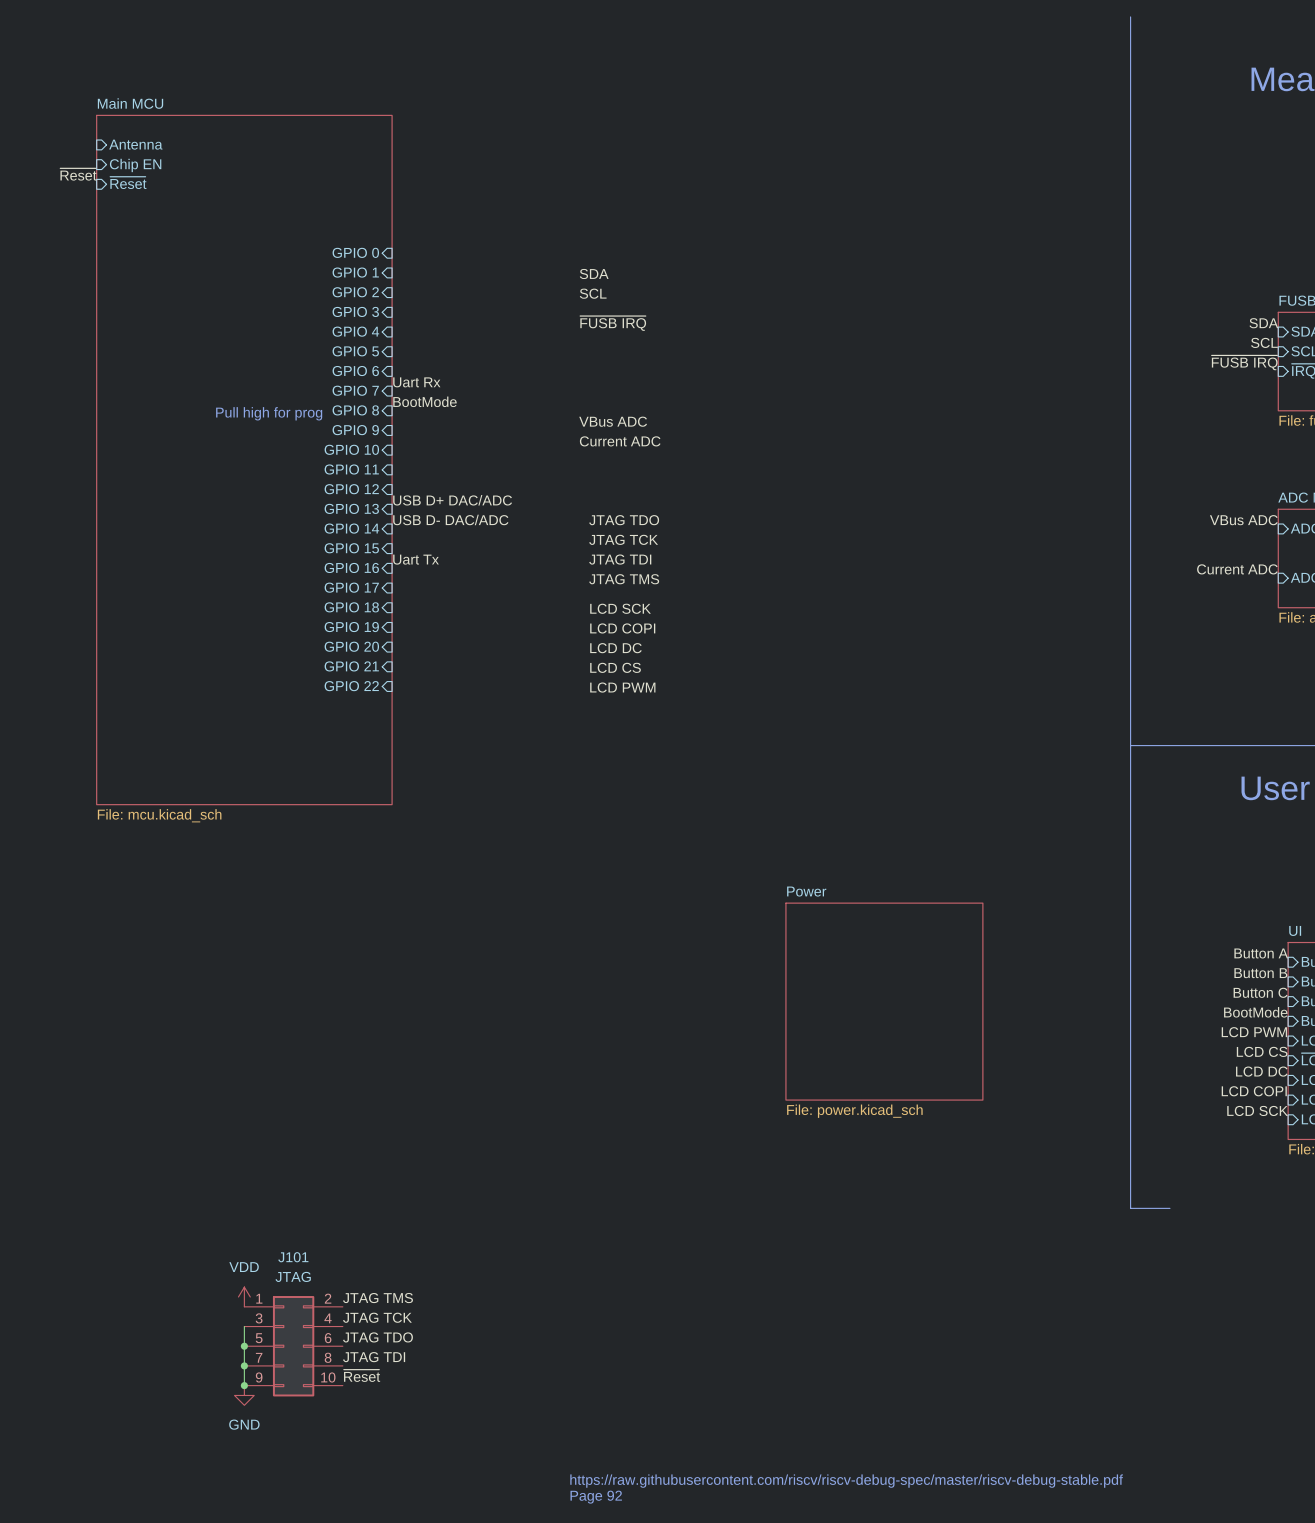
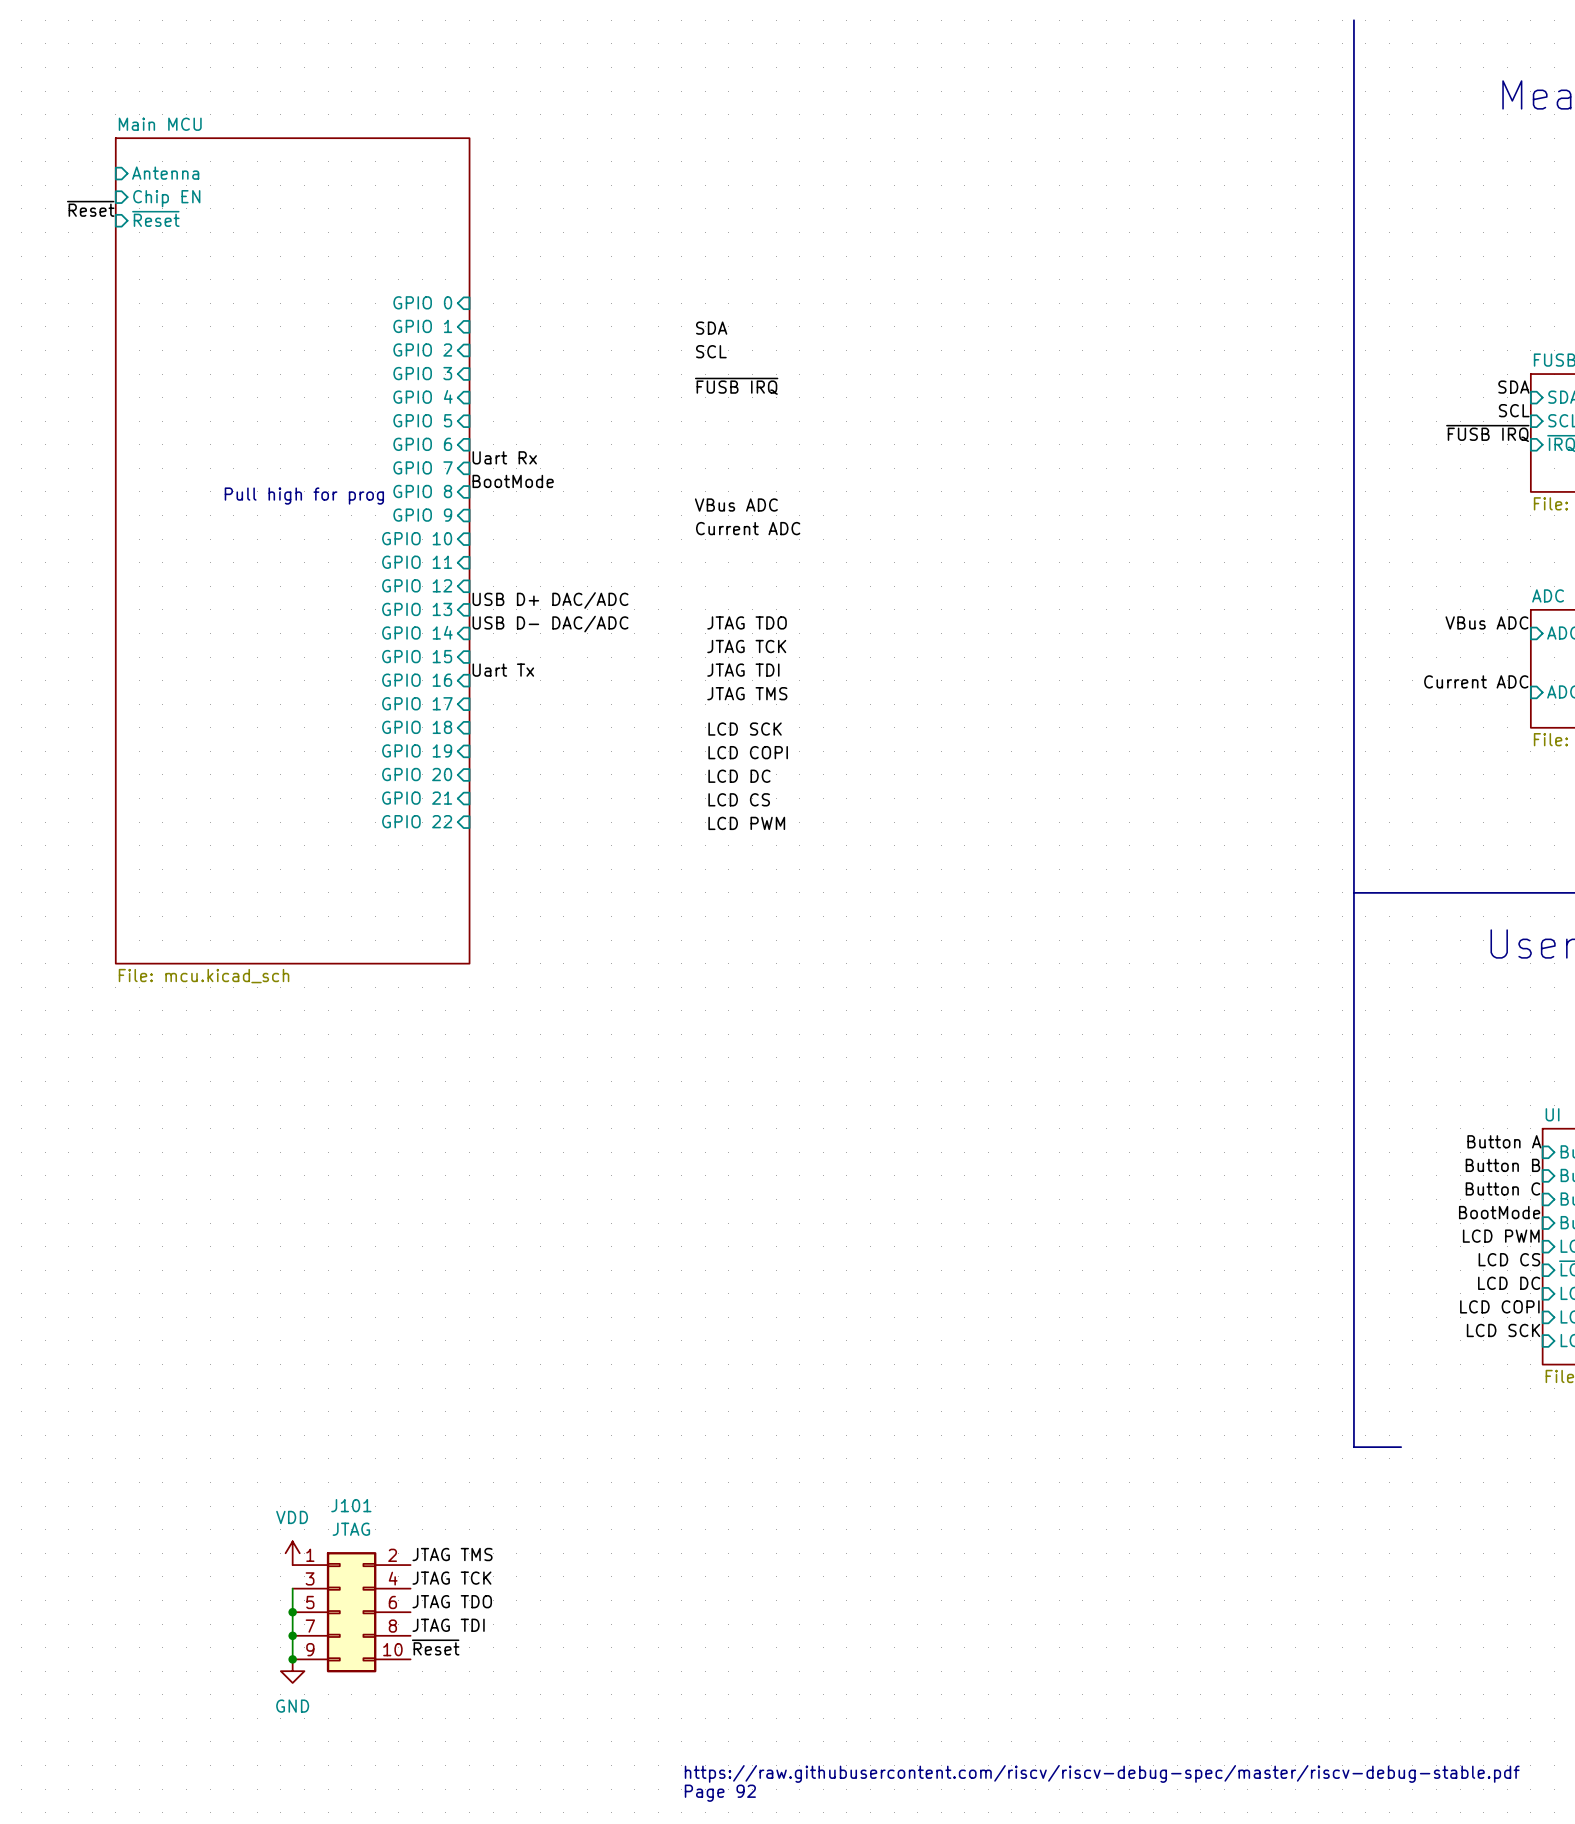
sheet Power: File: power.kicad_sch (884, 1001) -> none

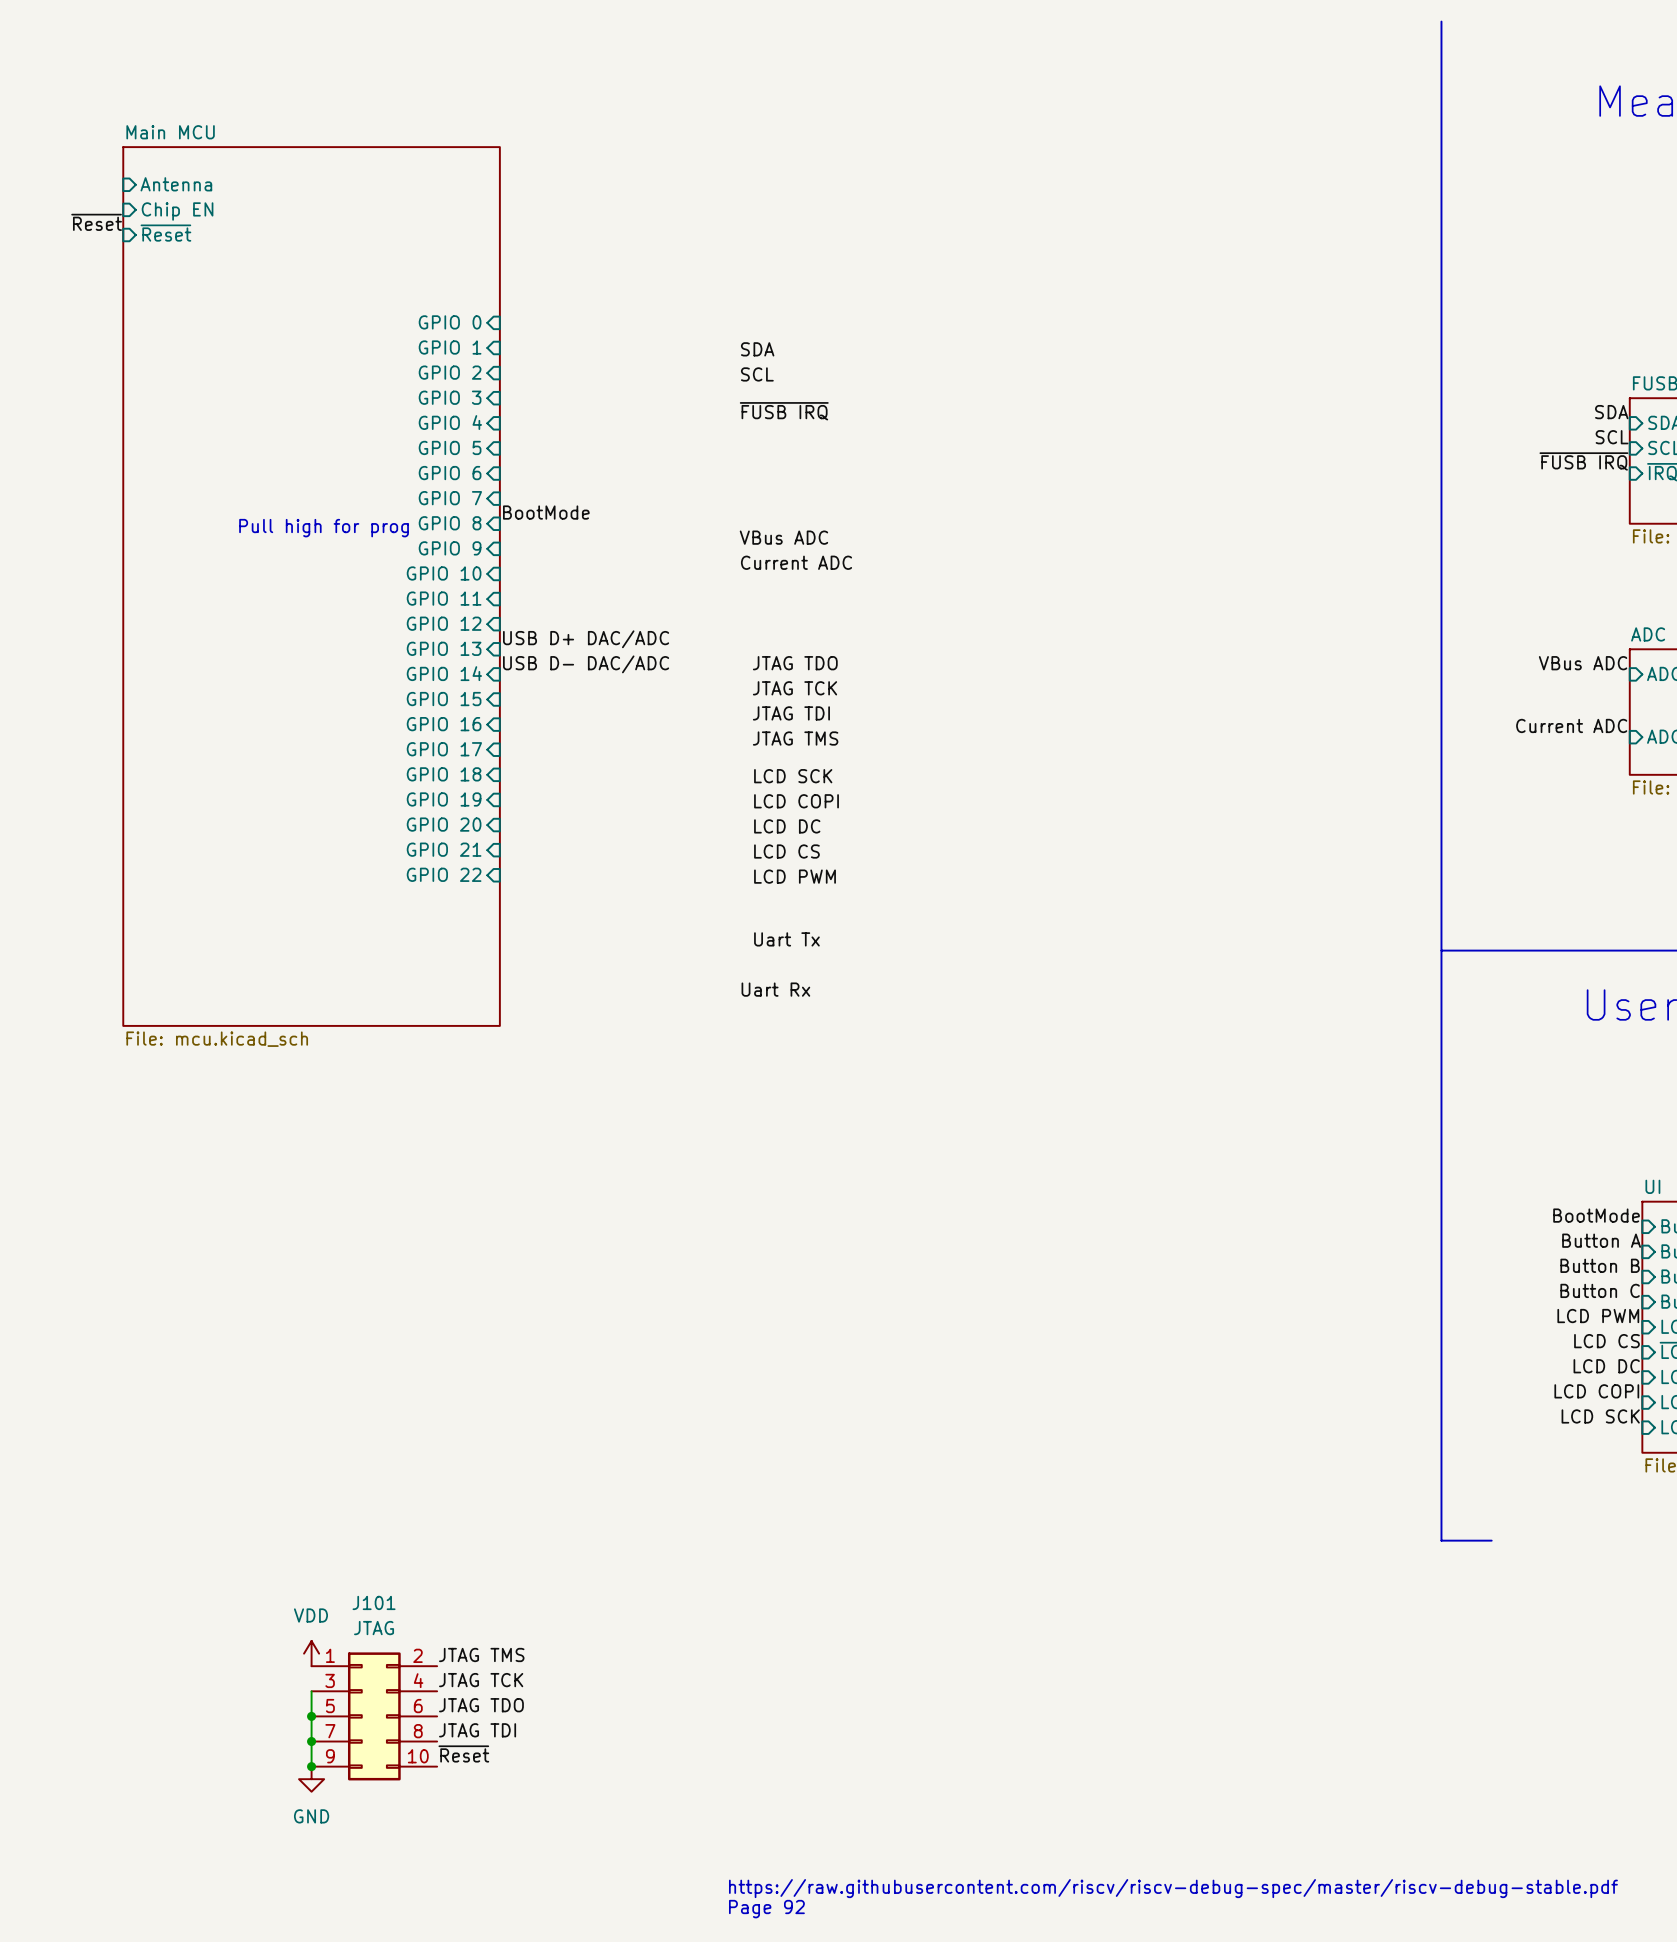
label: Uart Rx (504, 457) -> none
label: Uart Tx (503, 670) -> none
label: none -> Uart Tx (786, 939)
label: none -> Uart Rx (775, 989)
label: Button A (1504, 1141) -> BootMode (1596, 1215)
label: Button B (1502, 1165) -> Button A (1601, 1240)
label: Button C (1502, 1188) -> Button B (1600, 1265)
label: BootMode (1499, 1212) -> Button C (1600, 1290)

